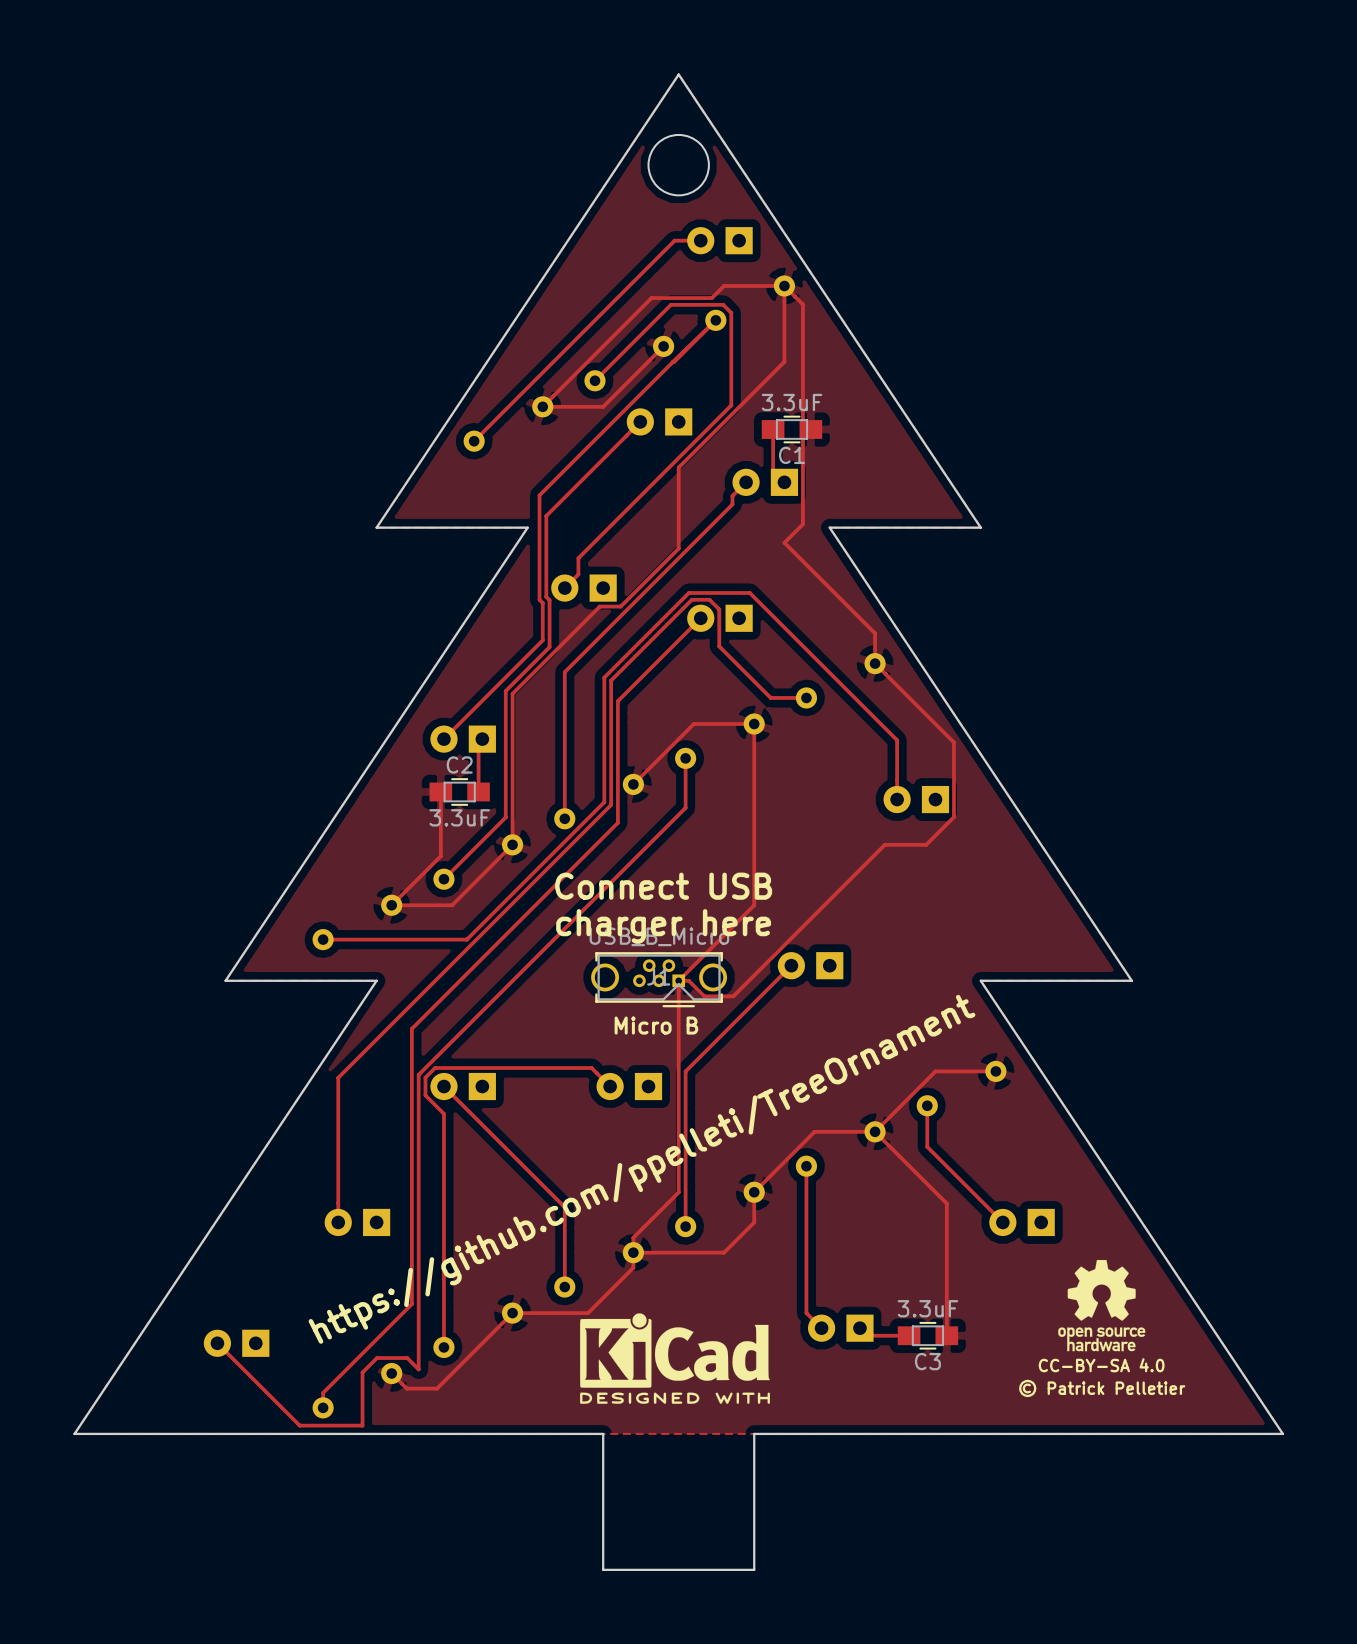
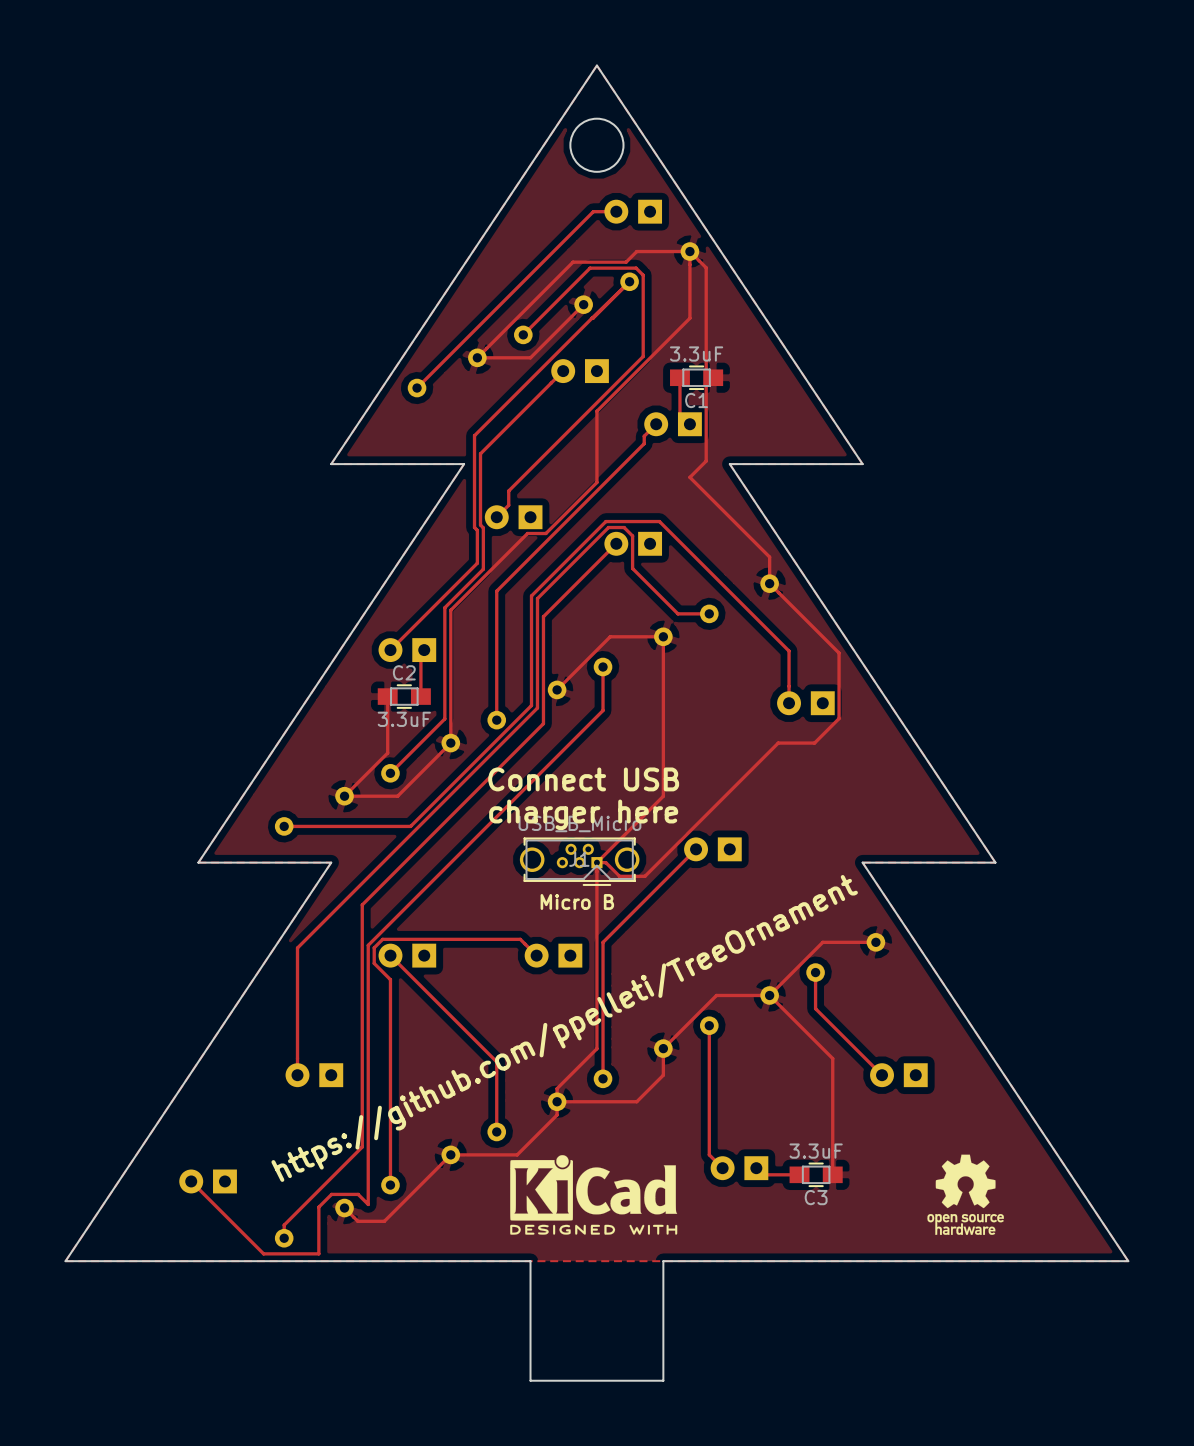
drawing position: (1101, 1305) -> (965, 1194)
text: CC-BY-SA 4.0 (1101, 1365) -> none
text: © Patrick Pelletier (1102, 1388) -> none

